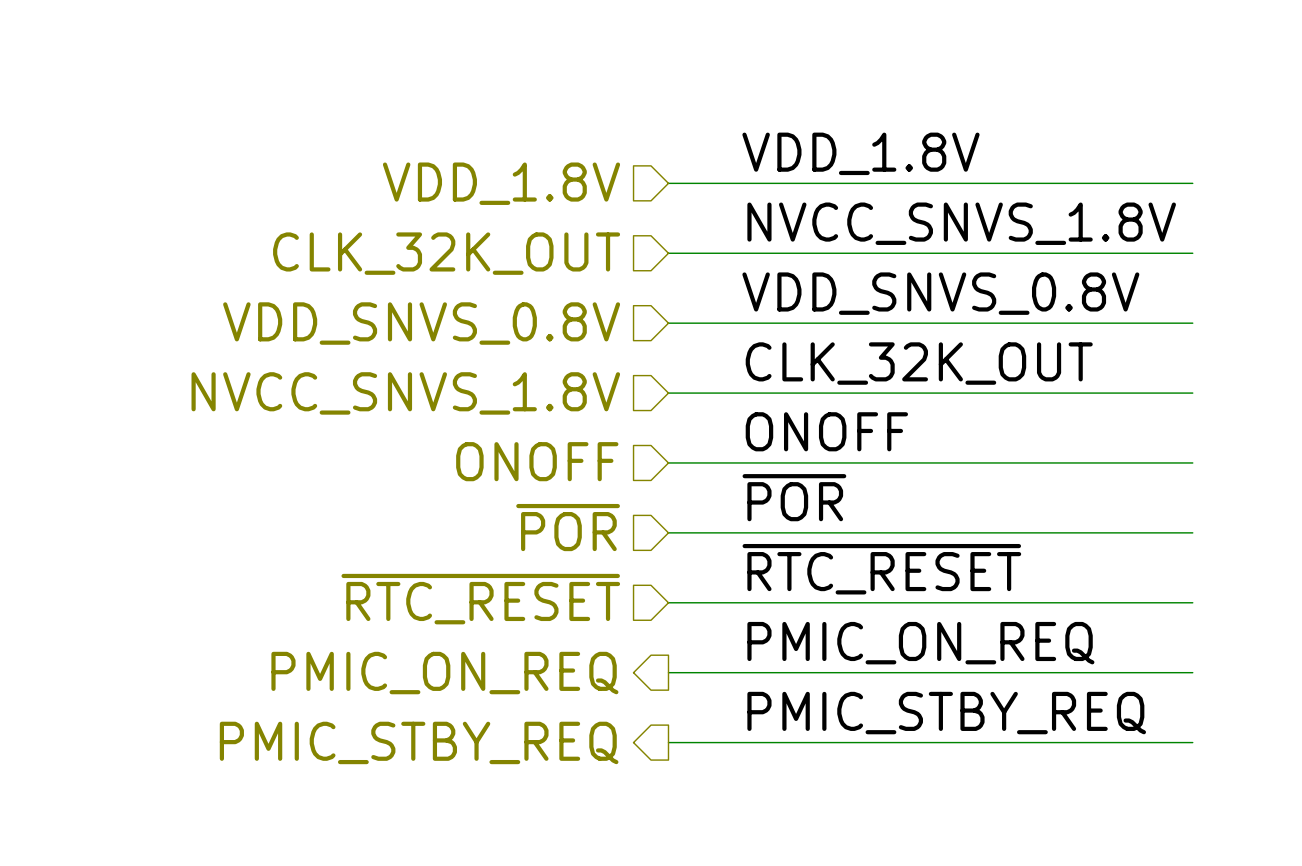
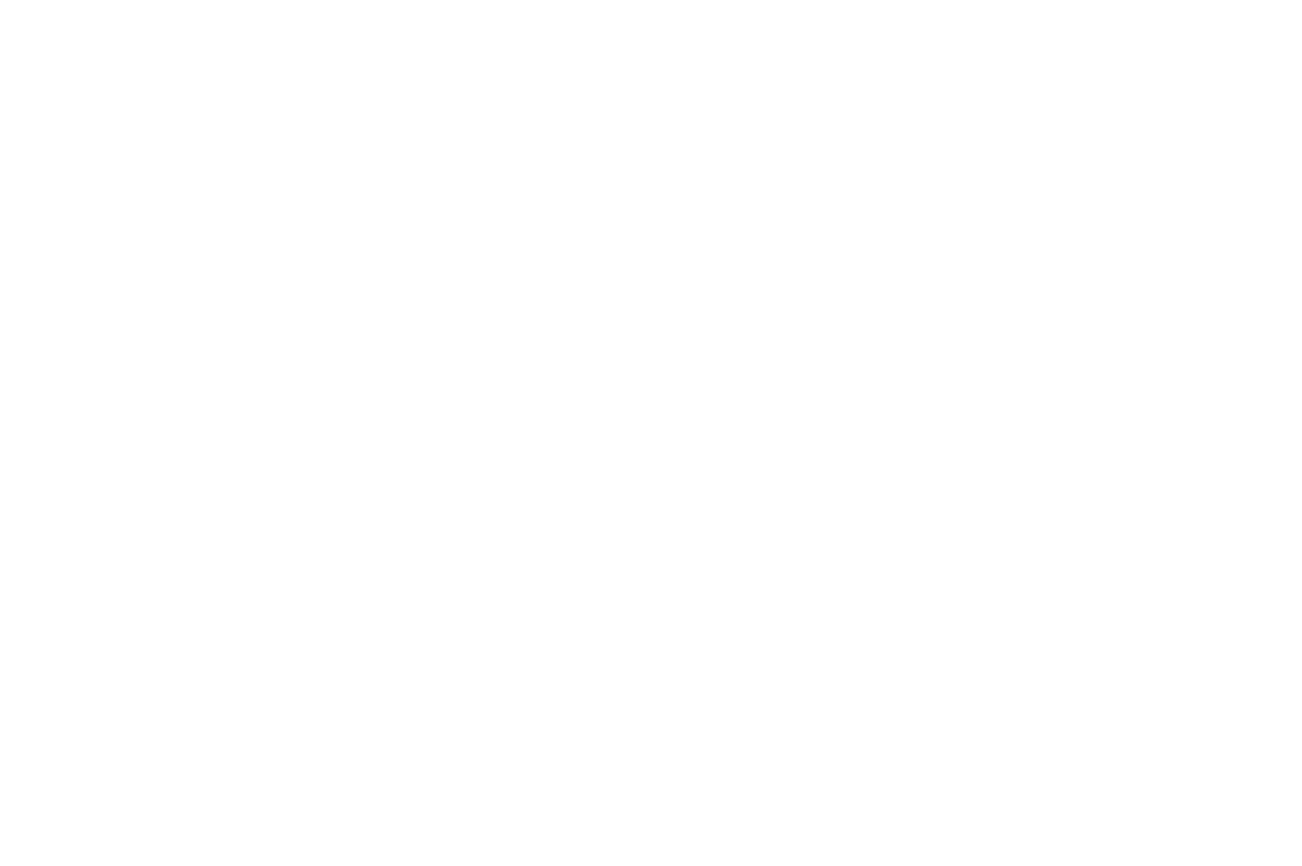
label: VDD_1.8V (860, 153) -> none
hierarchical label: VDD_1.8V (501, 183) -> none
wire: (668, 183) (1192, 183) -> none
label: NVCC_SNVS_1.8V (961, 223) -> none
hierarchical label: CLK_32K_OUT (446, 253) -> none
wire: (668, 253) (1192, 253) -> none
label: VDD_SNVS_0.8V (940, 293) -> none
hierarchical label: VDD_SNVS_0.8V (421, 323) -> none
wire: (668, 323) (1192, 323) -> none
label: CLK_32K_OUT (919, 363) -> none
hierarchical label: NVCC_SNVS_1.8V (405, 393) -> none
wire: (668, 393) (1192, 393) -> none
label: ONOFF (826, 431) -> none
hierarchical label: ONOFF (537, 461) -> none
wire: (668, 462) (1192, 462) -> none
label: ~{POR} (794, 497) -> none
hierarchical label: ~{POR} (568, 527) -> none
wire: (668, 532) (1192, 532) -> none
label: ~{RTC_RESET} (881, 569) -> none
hierarchical label: ~{RTC_RESET} (480, 599) -> none
wire: (668, 602) (1192, 602) -> none
label: PMIC_ON_REQ (920, 643) -> none
wire: (668, 672) (1192, 672) -> none
hierarchical label: PMIC_ON_REQ (444, 673) -> none
label: PMIC_STBY_REQ (946, 713) -> none
hierarchical label: PMIC_STBY_REQ (419, 742) -> none
wire: (668, 742) (1192, 742) -> none

